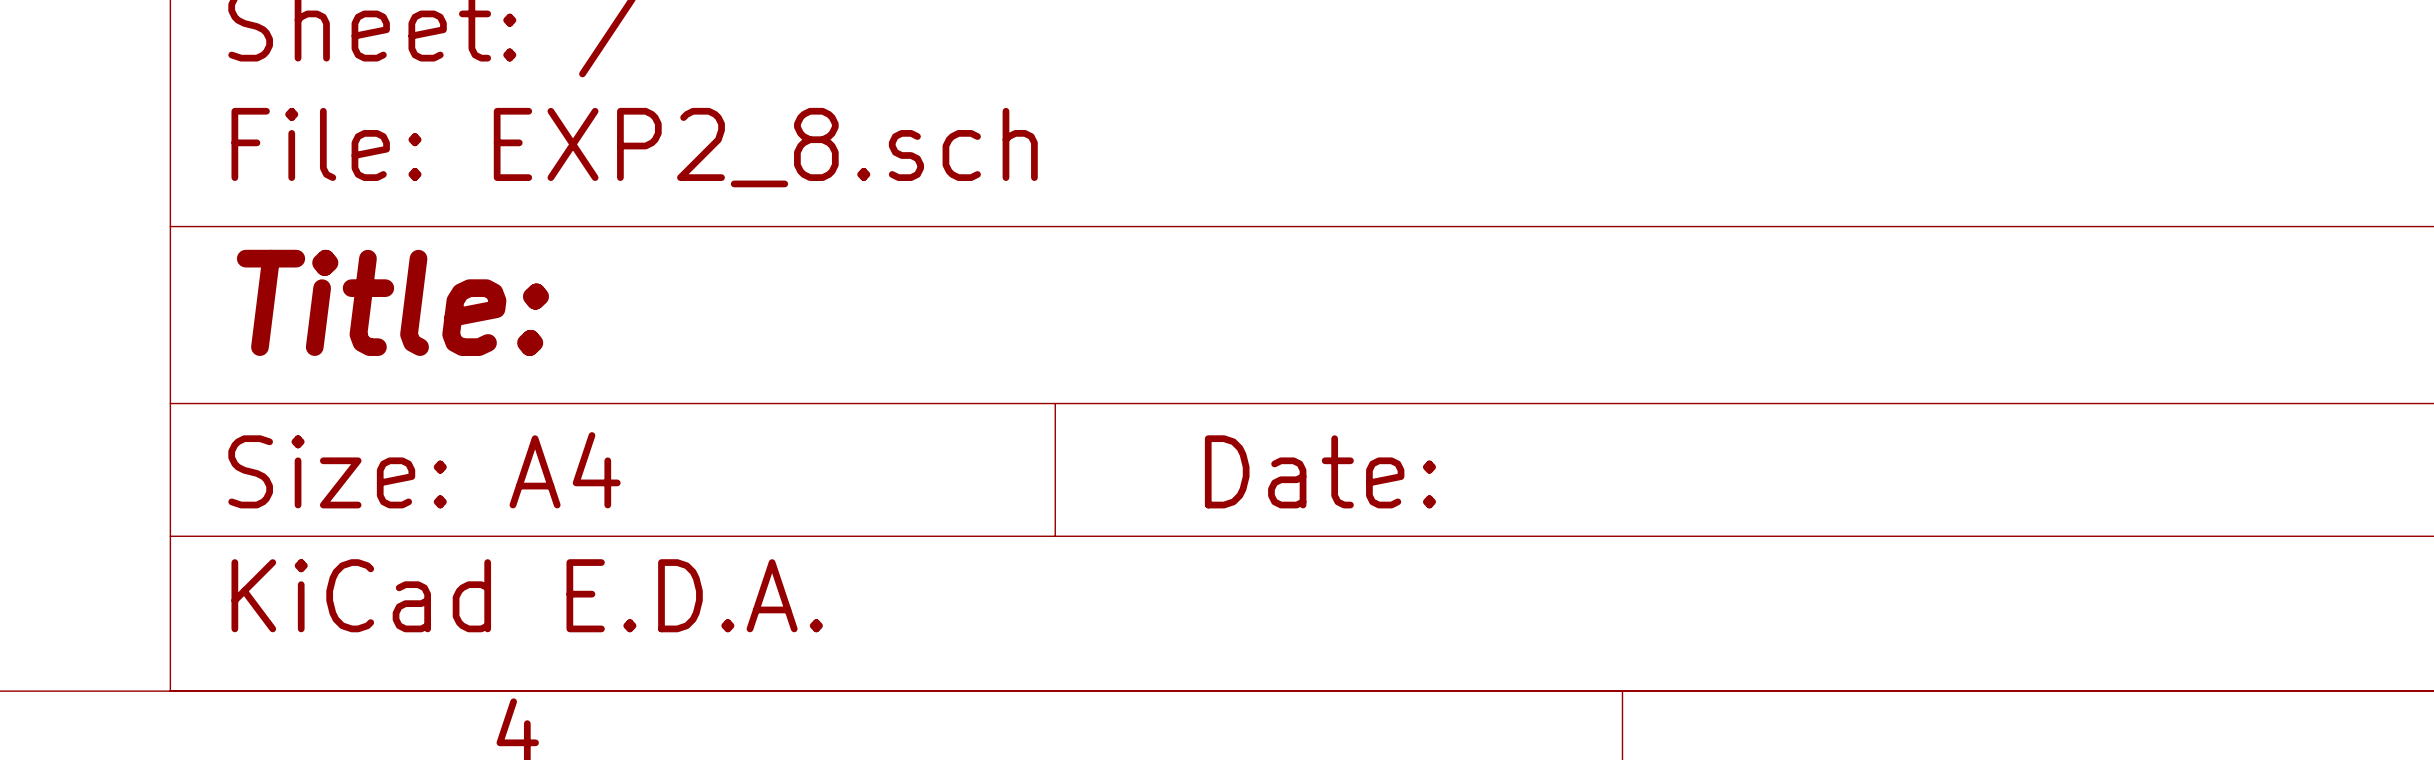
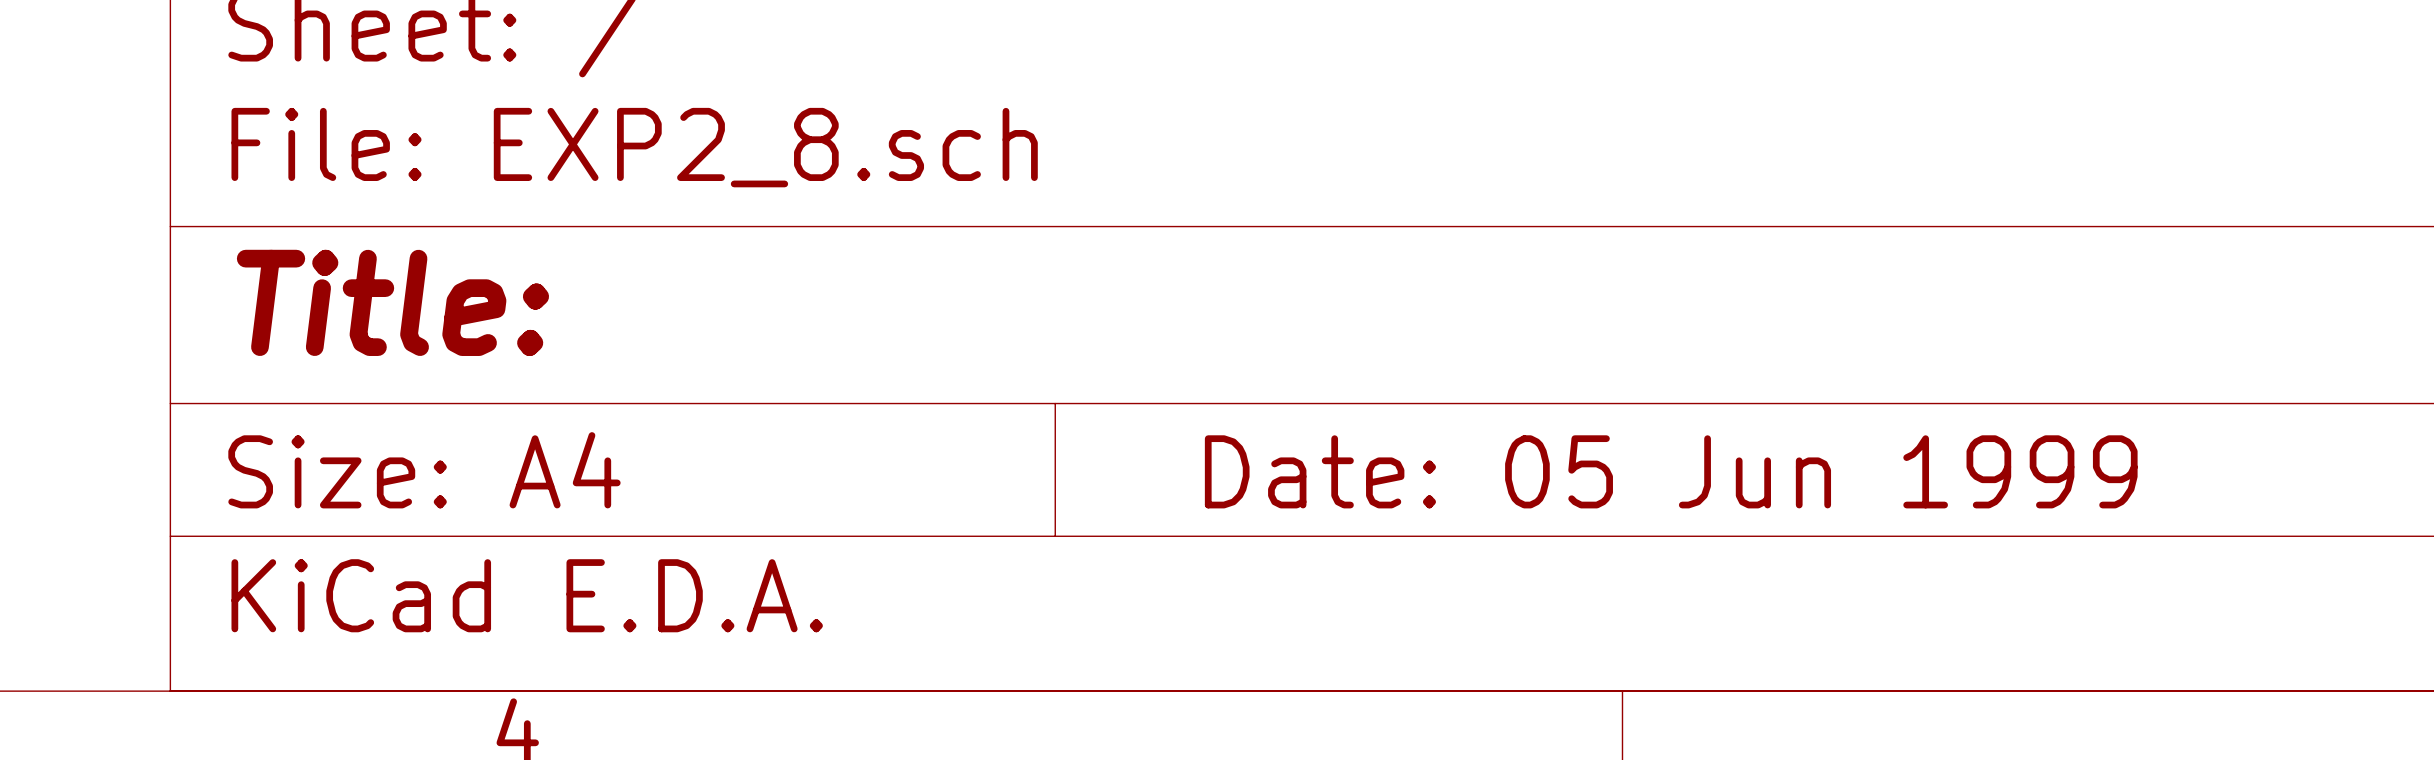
title block: Date: (1320, 471) -> Date: 05 Jun 1999 (1671, 471)

